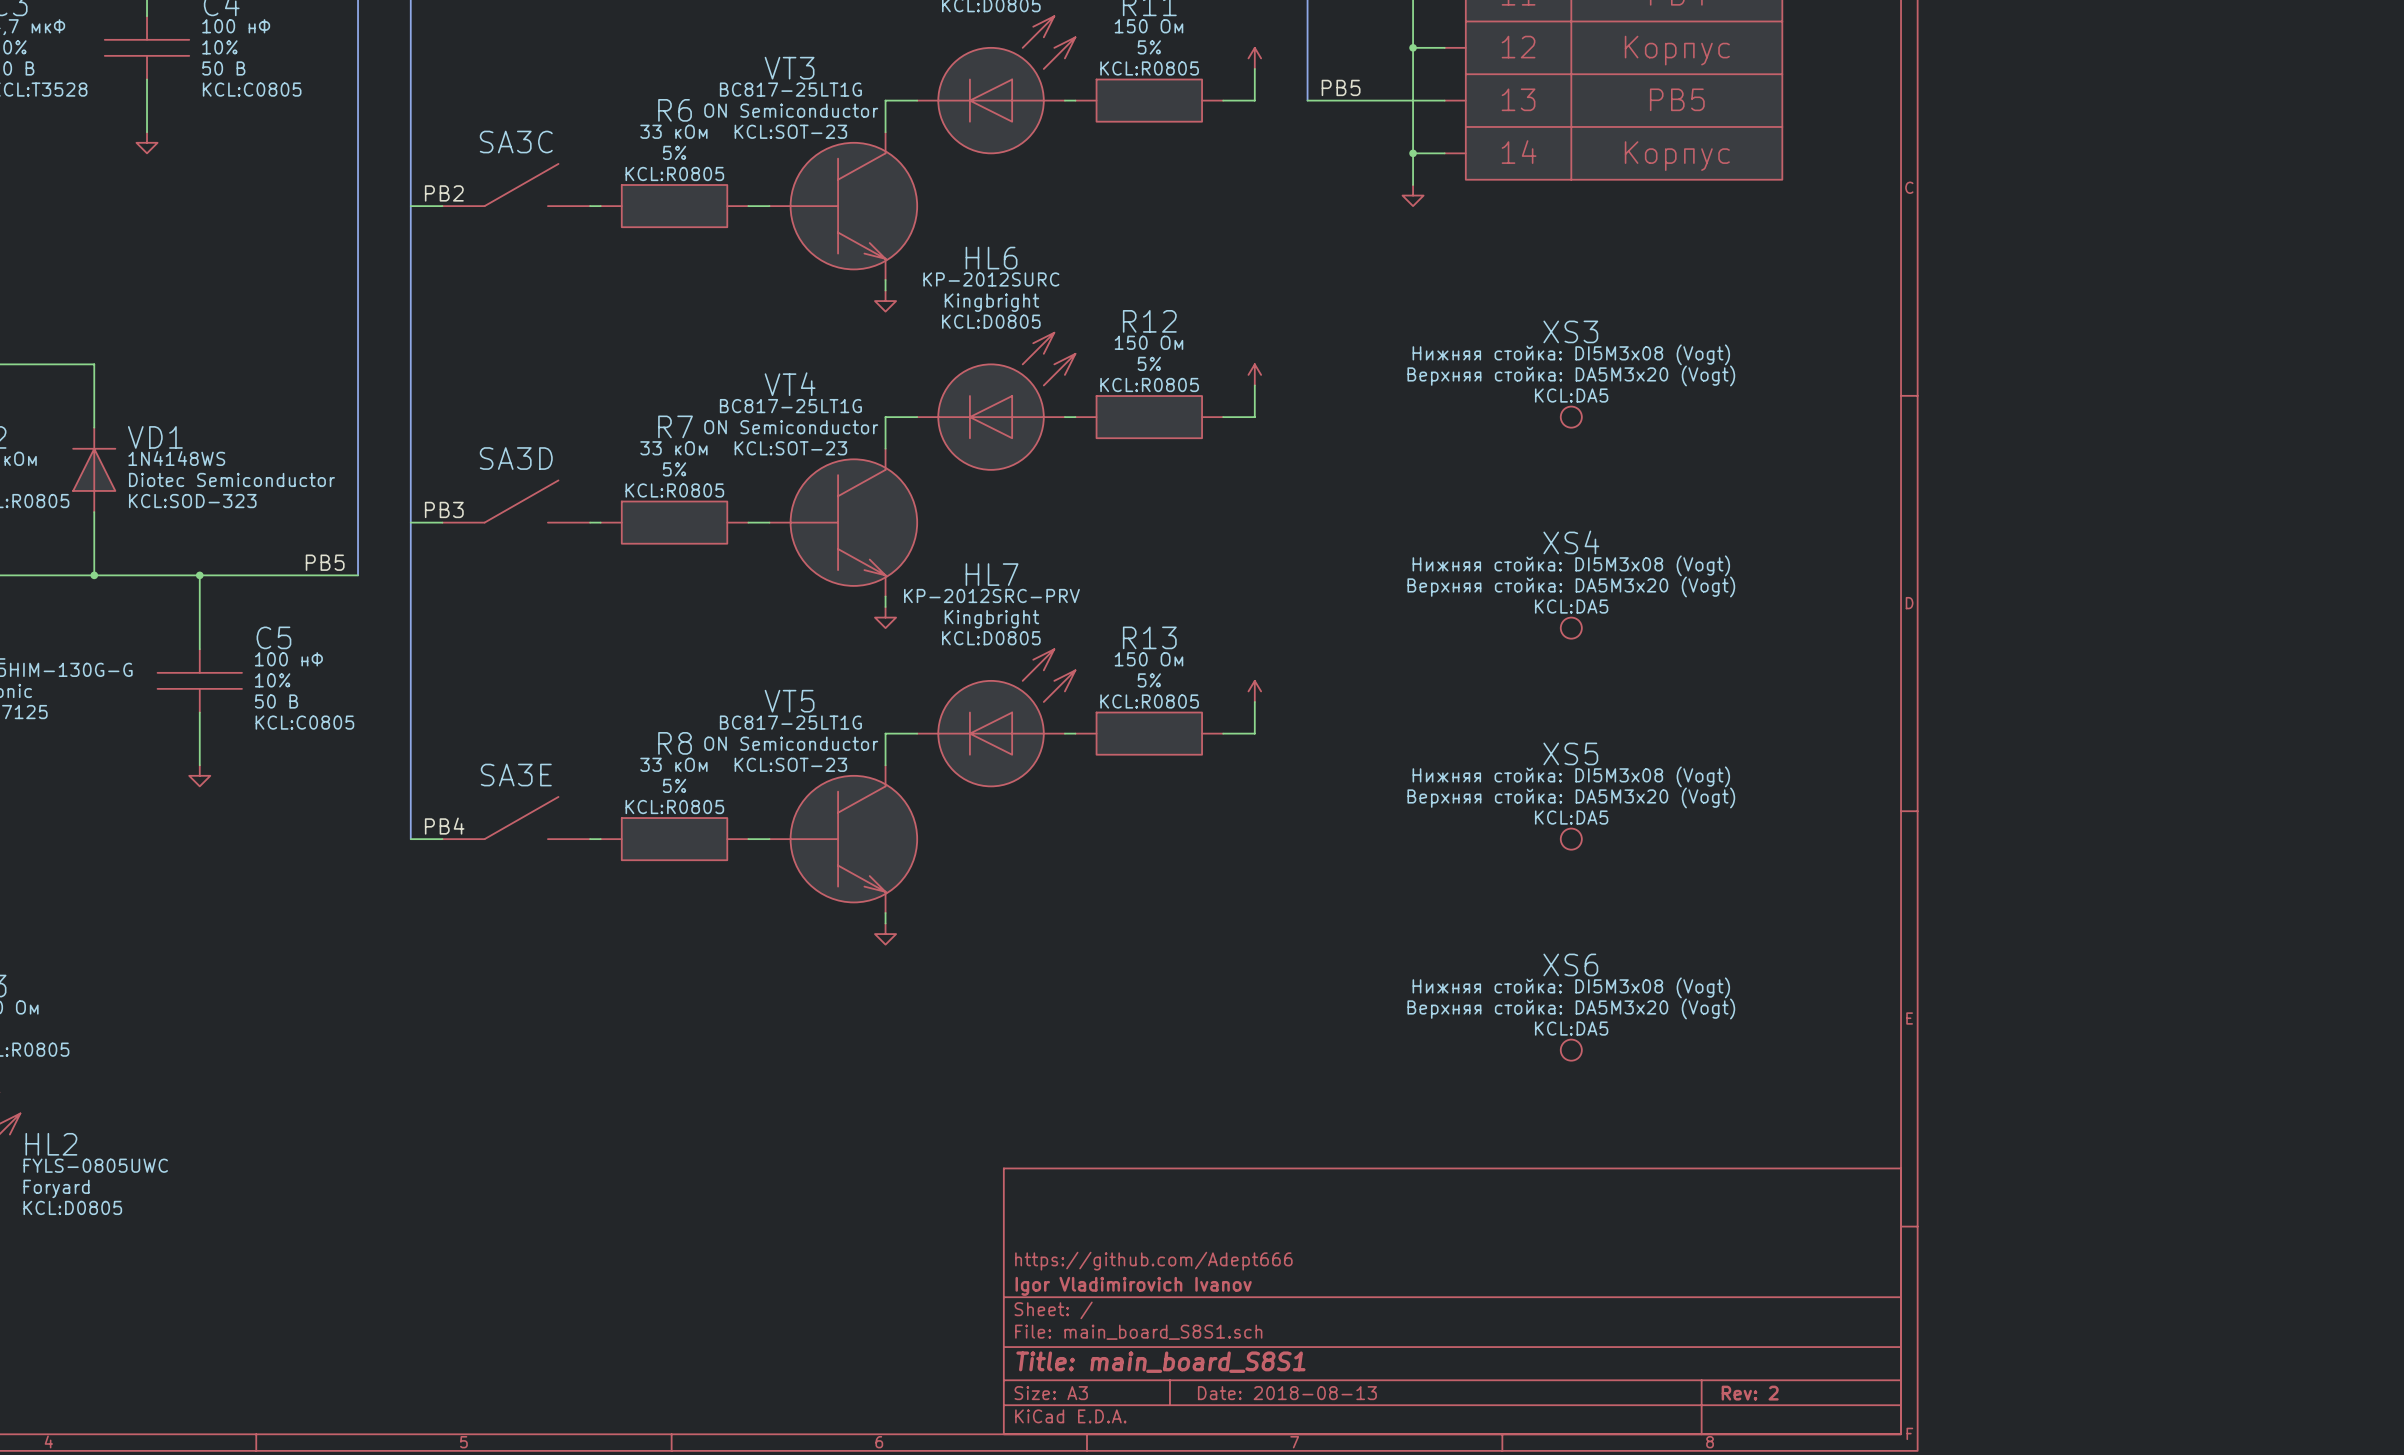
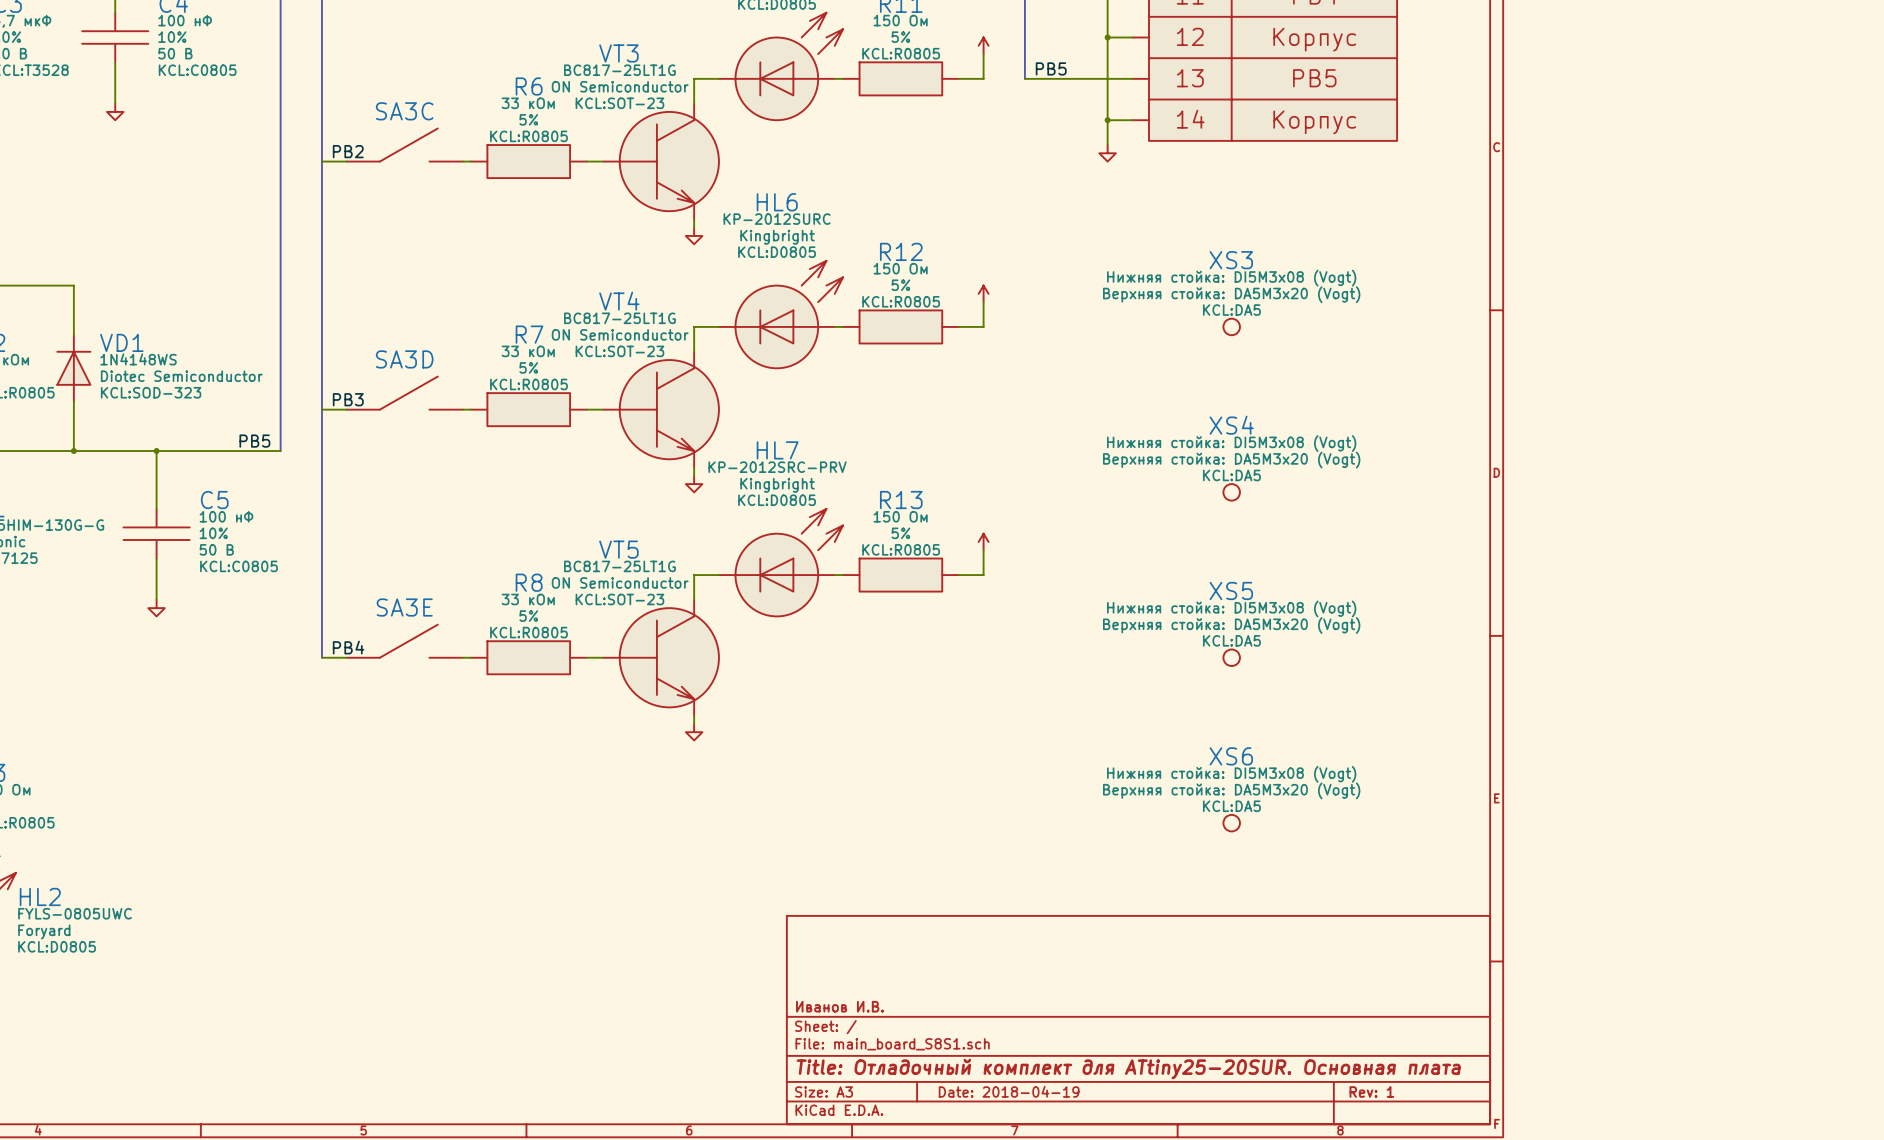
title block: https://github.com/Adept666 (1153, 1261) -> none
title block: Igor Vladimirovich Ivanov (1133, 1286) -> Иванов И.В. (840, 1006)
title block: Title: main_board_S8S1 (1160, 1362) -> Title: Отладочный комплект для ATtiny25-20SUR. Основная плата (1128, 1068)
title block: Date: 2018-08-13 (1287, 1393) -> Date: 2018-04-19 (1009, 1091)
title block: Rev: 2 (1750, 1393) -> Rev: 1 (1371, 1092)

